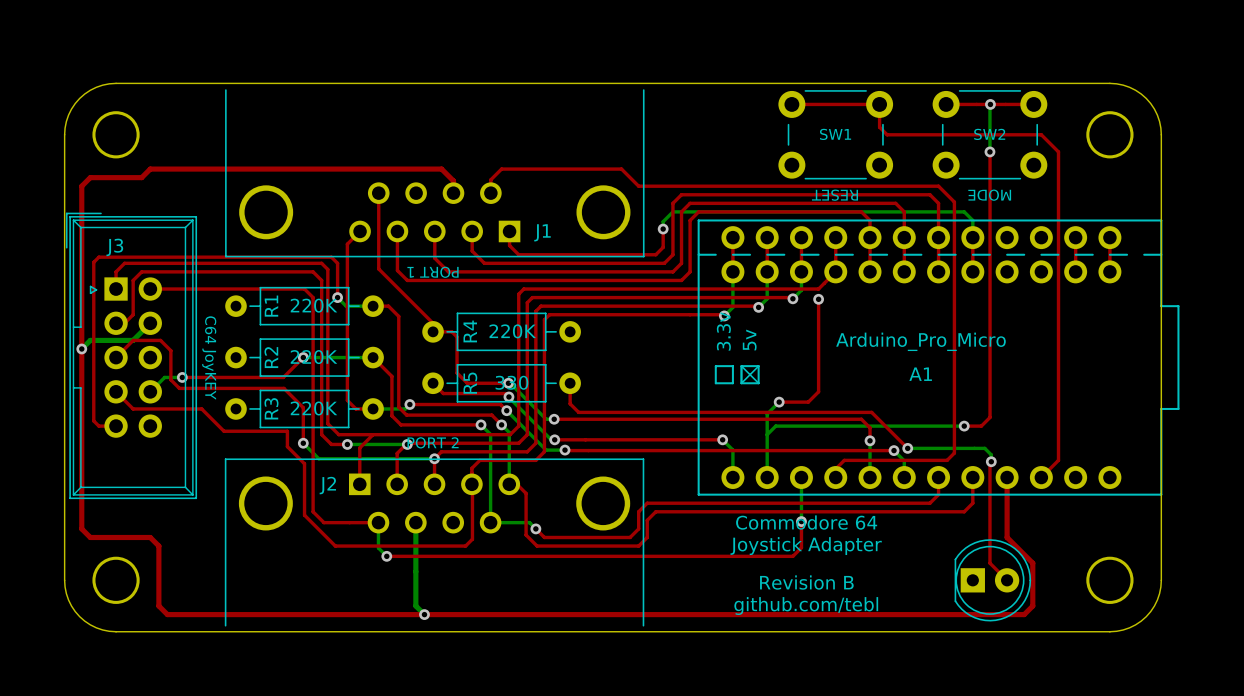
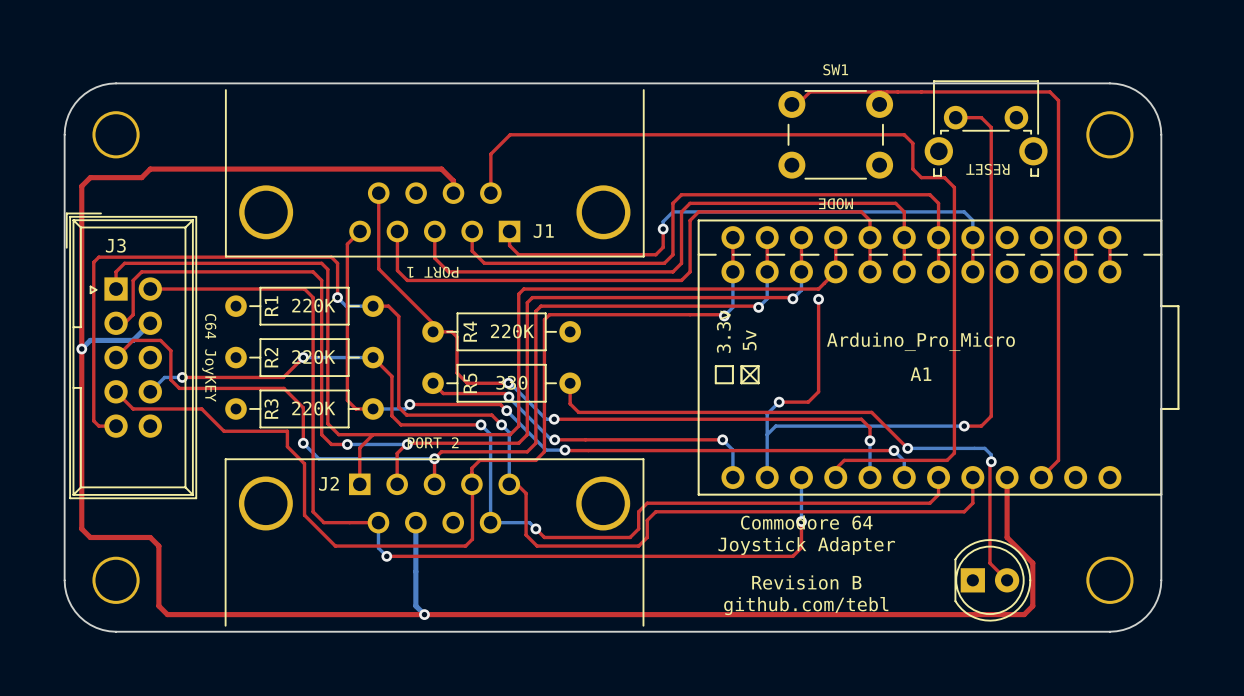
top track: (791, 104) (879, 104) (879, 127) (887, 134) -> none
top track: (946, 104) (1033, 104) -> none
bottom track: (990, 104) (989, 151) -> none
via: (990, 104) -> none
part: none -> (986, 128)
SW1 name position: SW1 (835, 134) -> SW1 (835, 69)
top track: (904, 134) (1041, 134) (1058, 151) -> (792, 109) (810, 91) (1049, 91) (1058, 100) (1058, 151)
top track: none -> (904, 134) (912, 143) (912, 169) (921, 177) (944, 177) (954, 187) (954, 202)
SW2: (989, 134) -> none
via: (989, 151) -> none
top track: (990, 152) (990, 417) -> (955, 117) (981, 117) (991, 127) (990, 417)
top track: (490, 179) (501, 169) (621, 169) (638, 186) (938, 186) (954, 202) -> (490, 179) (490, 154) (510, 134) (887, 134)
text position: RESET (834, 195) -> RESET (987, 169)
text position: MODE (989, 195) -> MODE (835, 203)

